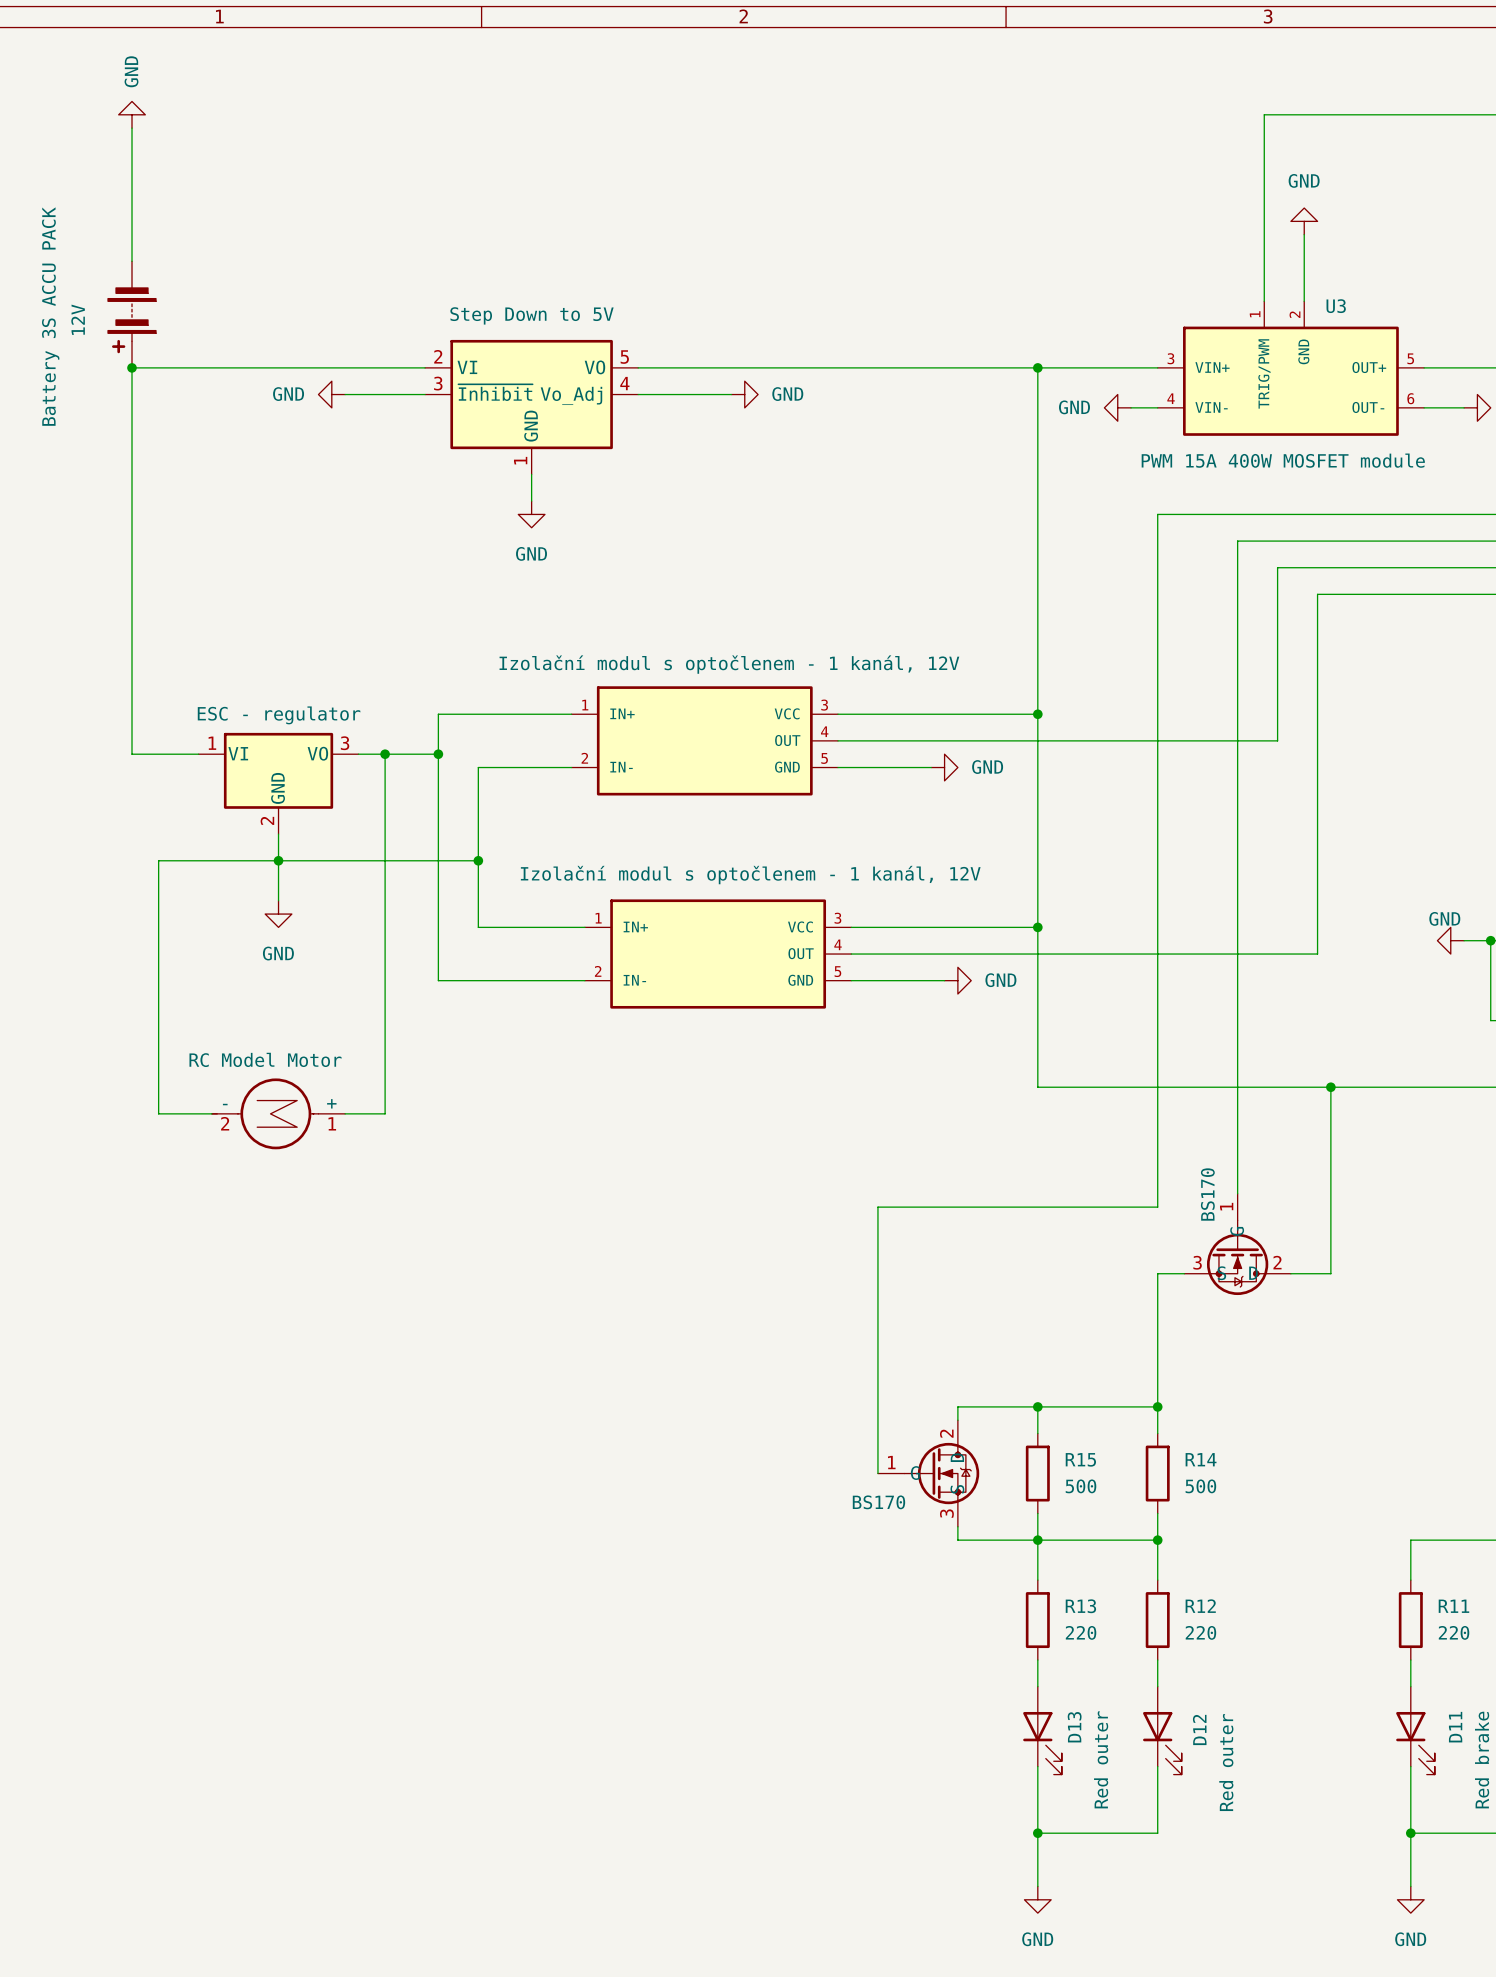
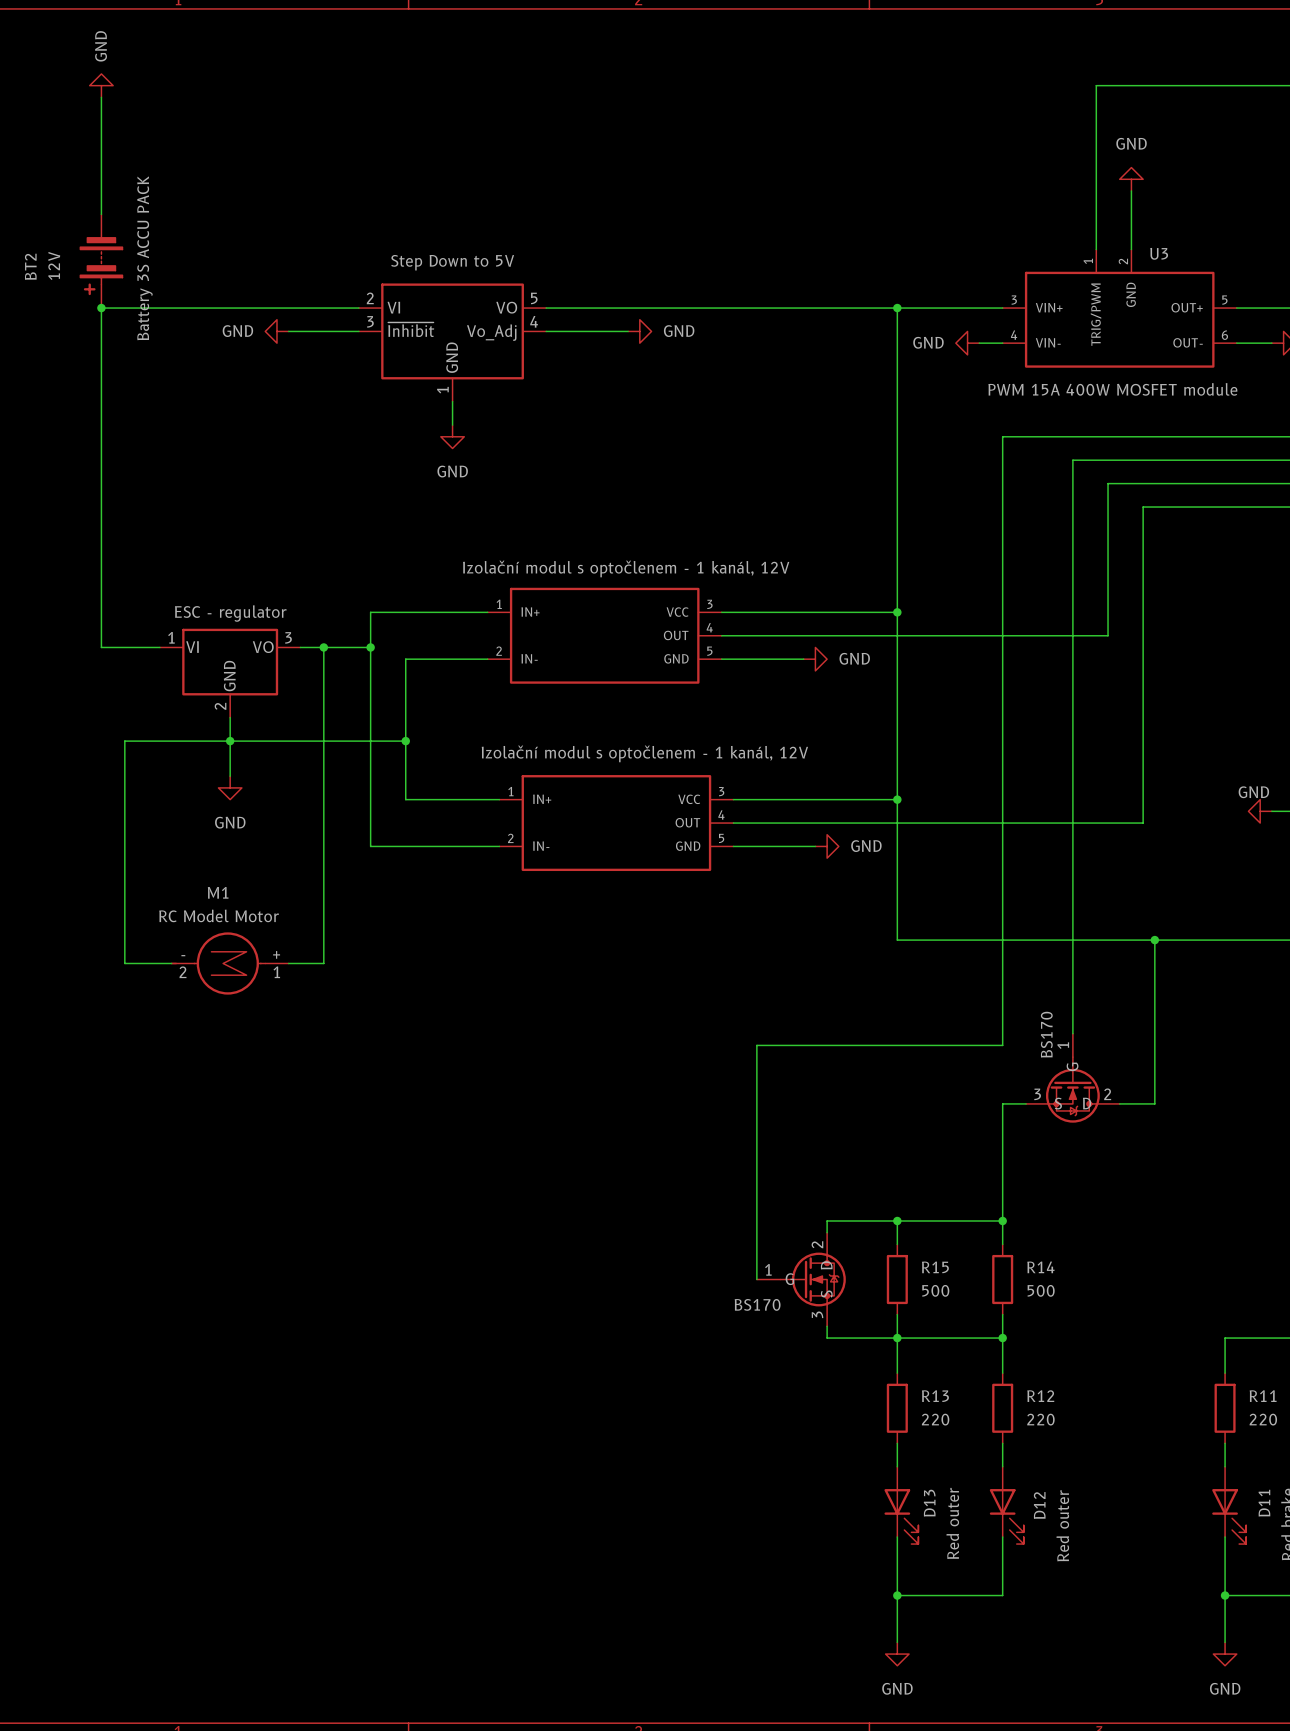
BT2 text position: Battery 3S ACCU PACK (50, 316) -> Battery 3S ACCU PACK (144, 258)
BT2 name: none -> BT2 (30, 266)
M1 name: none -> M1 (218, 892)

